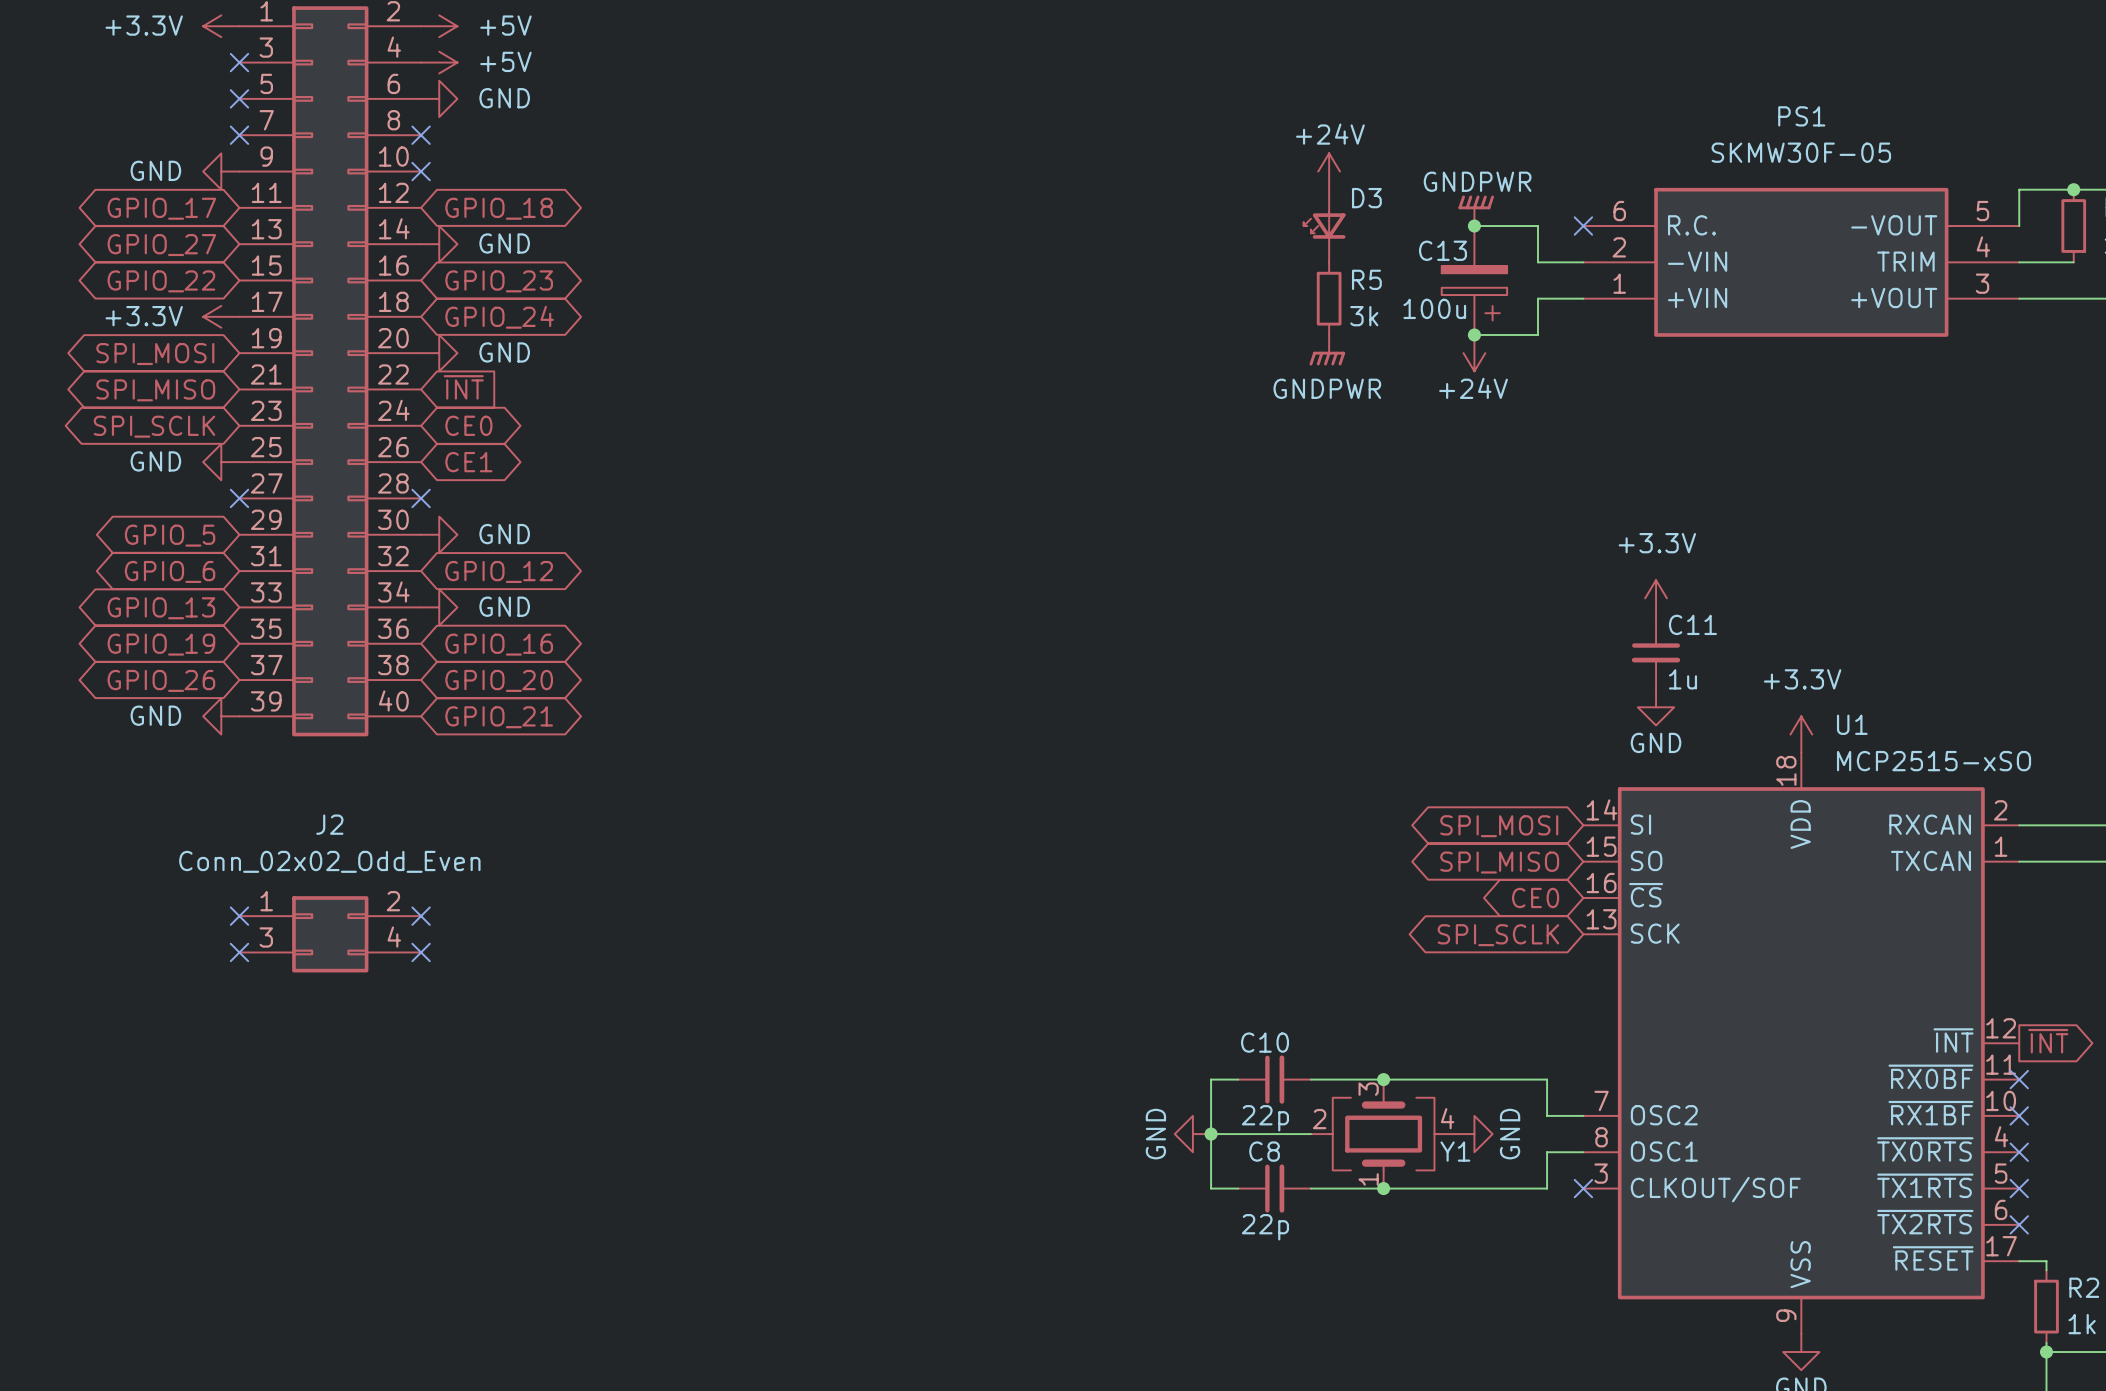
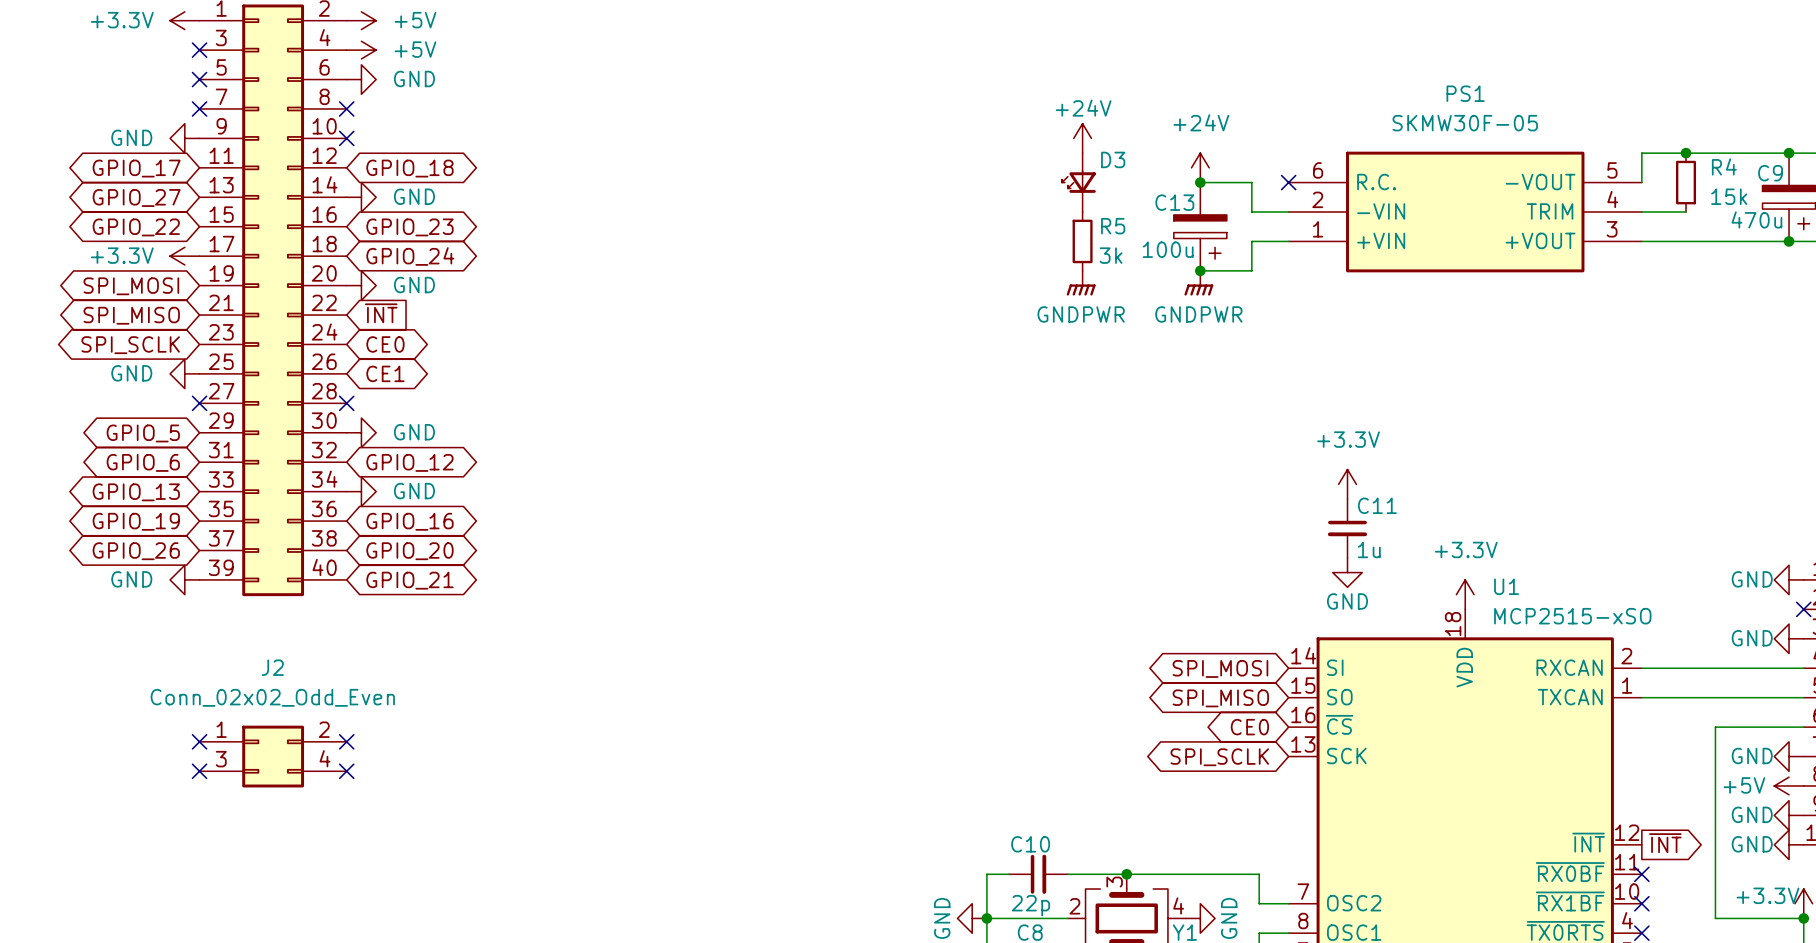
power symbol: GNDPWR (1476, 210) -> +24V (1200, 167)
power symbol: +24V (1474, 353) -> GNDPWR (1198, 283)

